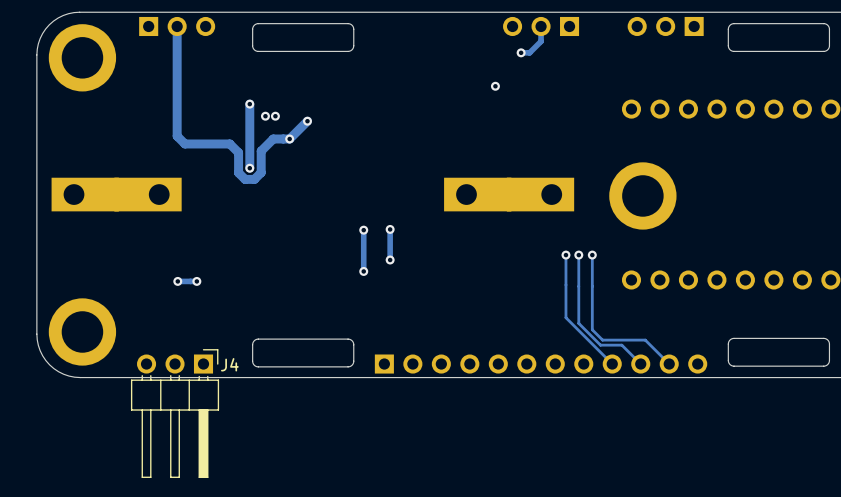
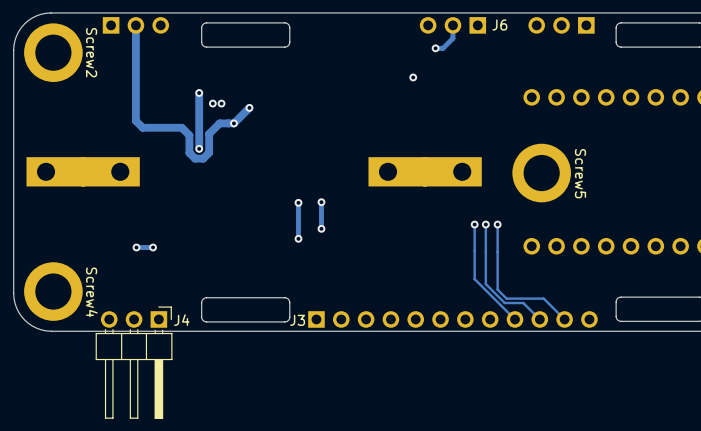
J6 name: none -> J6 (499, 25)
Screw2 name: none -> Screw2 (91, 52)
Screw5 name: none -> Screw5 (580, 173)
Screw4 name: none -> Screw4 (91, 292)
J3 name: none -> J3 (297, 320)

